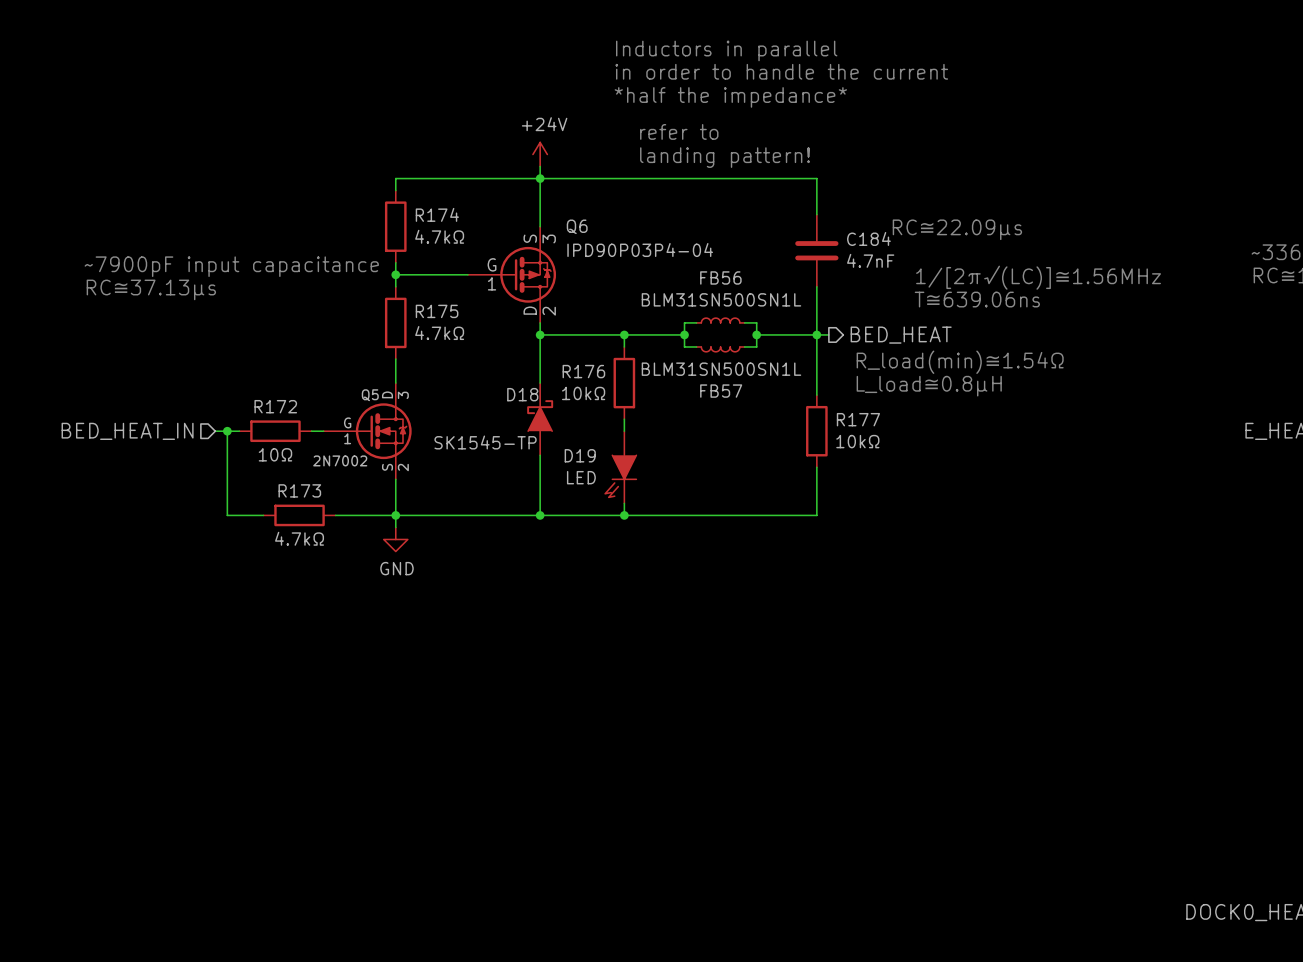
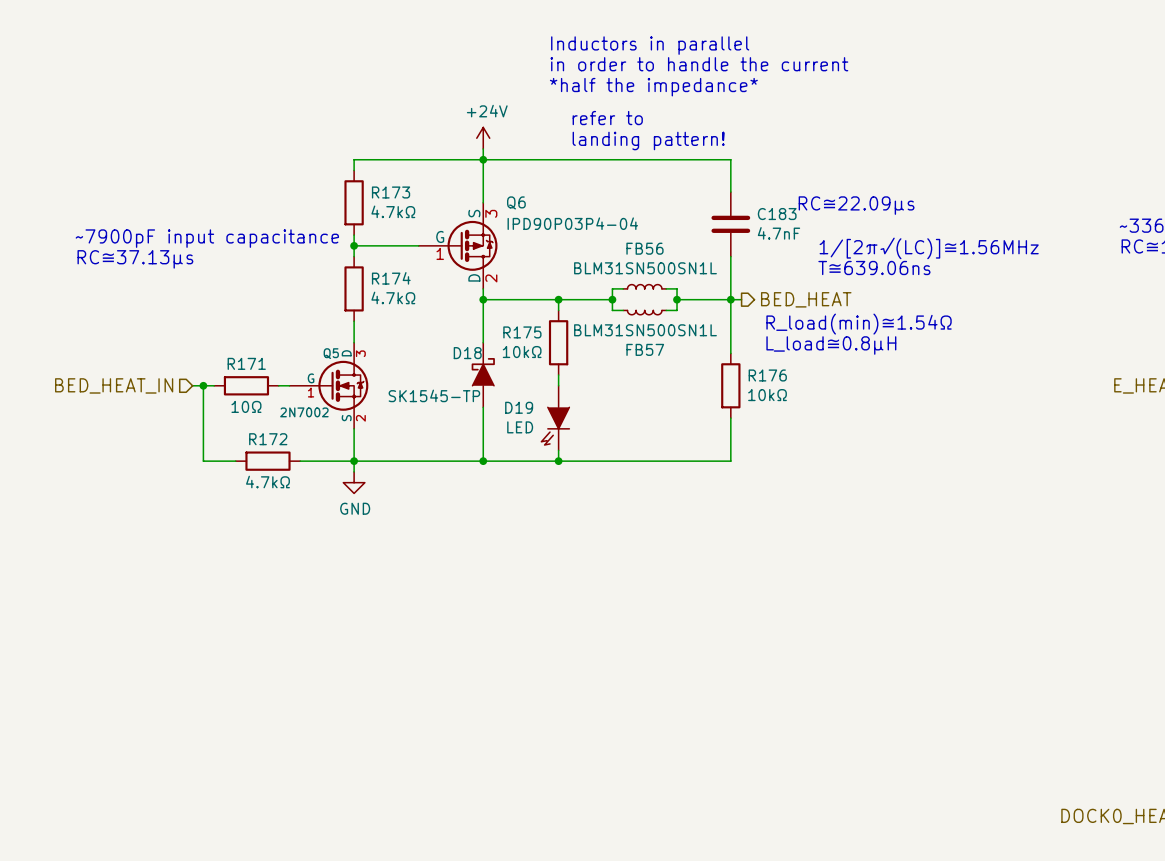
R174 name: R174 (437, 214) -> R173 (391, 192)
C184 name: C184 (868, 238) -> C183 (777, 214)
R175 name: R175 (437, 311) -> R174 (391, 278)
R176 name: R176 (583, 371) -> R175 (522, 332)
R172 name: R172 (275, 406) -> R171 (246, 363)
R177 name: R177 (858, 419) -> R176 (767, 375)
R173 name: R173 (299, 490) -> R172 (268, 439)

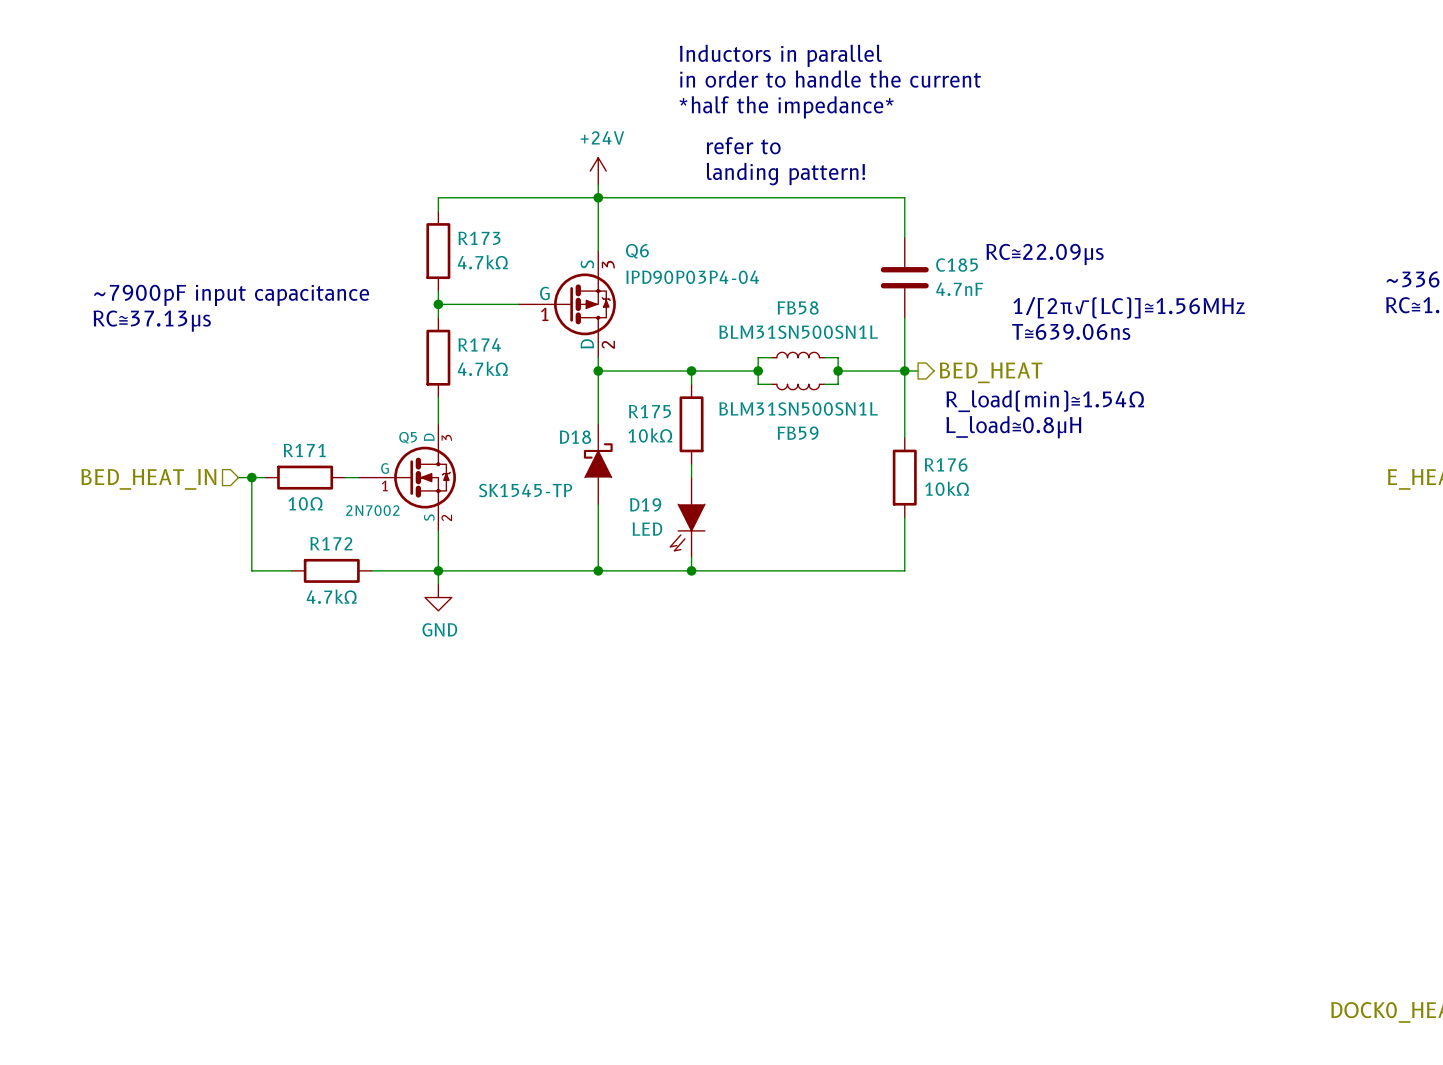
C183 name: C183 (777, 214) -> C185 (957, 265)
FB56 name: FB56 (644, 248) -> FB58 (798, 307)
FB57 name: FB57 (645, 349) -> FB59 (798, 433)

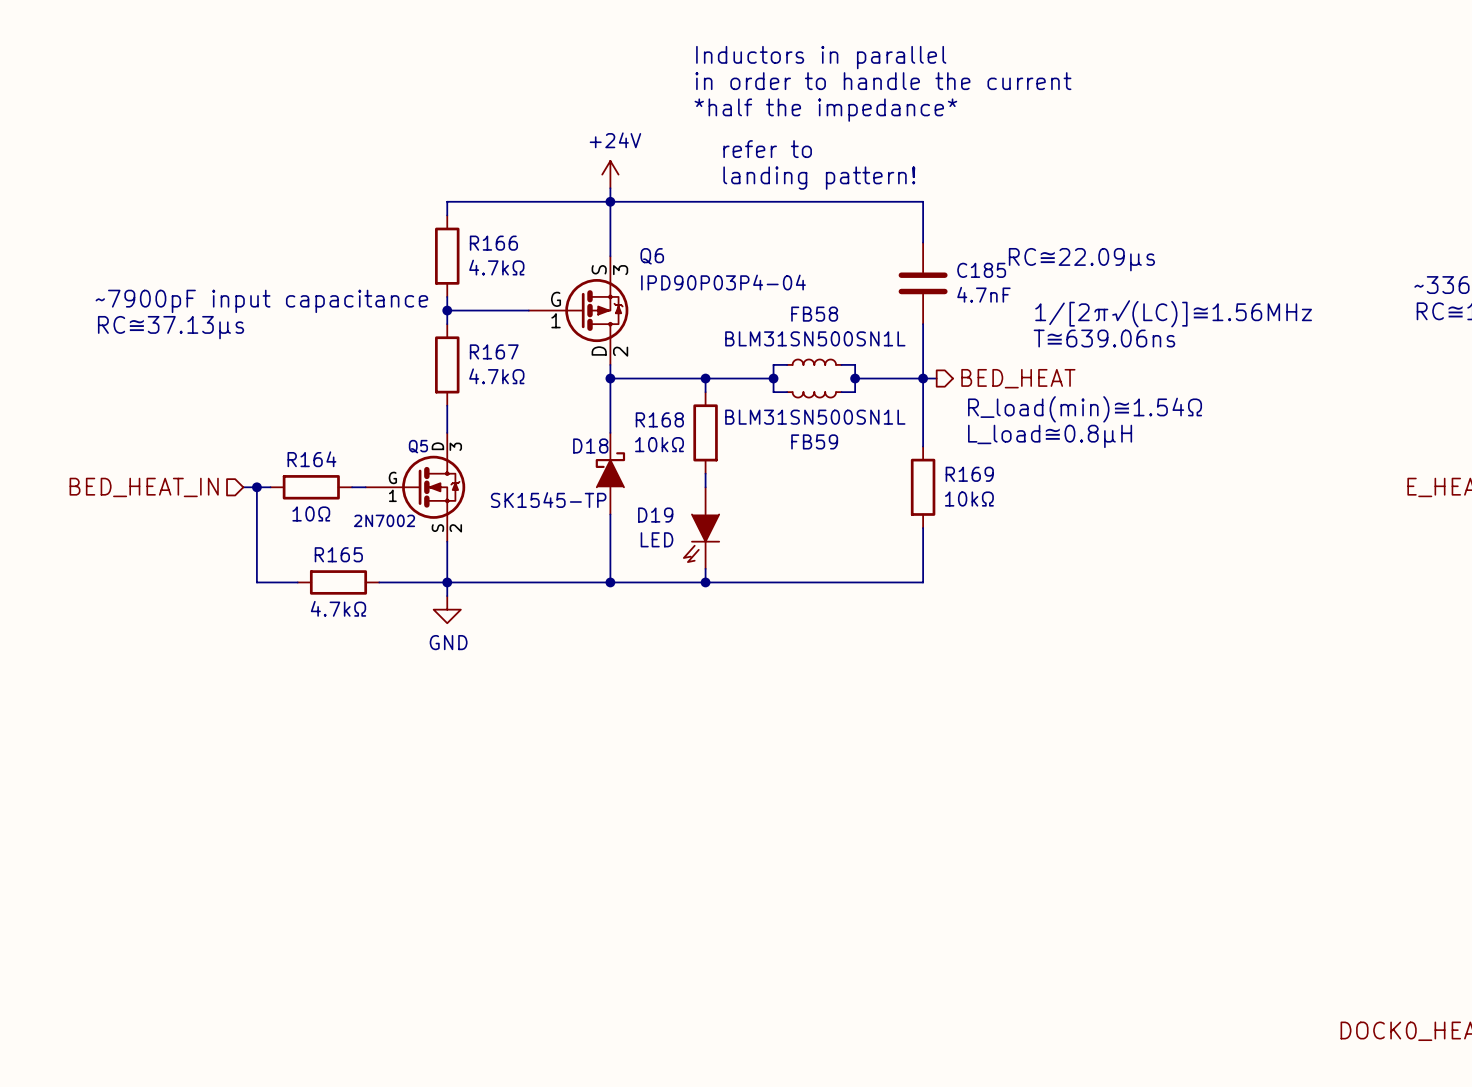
R173 name: R173 (479, 238) -> R166 (493, 243)
R174 name: R174 (479, 344) -> R167 (494, 351)
R175 name: R175 (649, 411) -> R168 (659, 419)
R171 name: R171 (304, 450) -> R164 (311, 459)
R176 name: R176 (946, 464) -> R169 (969, 474)
R172 name: R172 (331, 543) -> R165 (338, 554)

